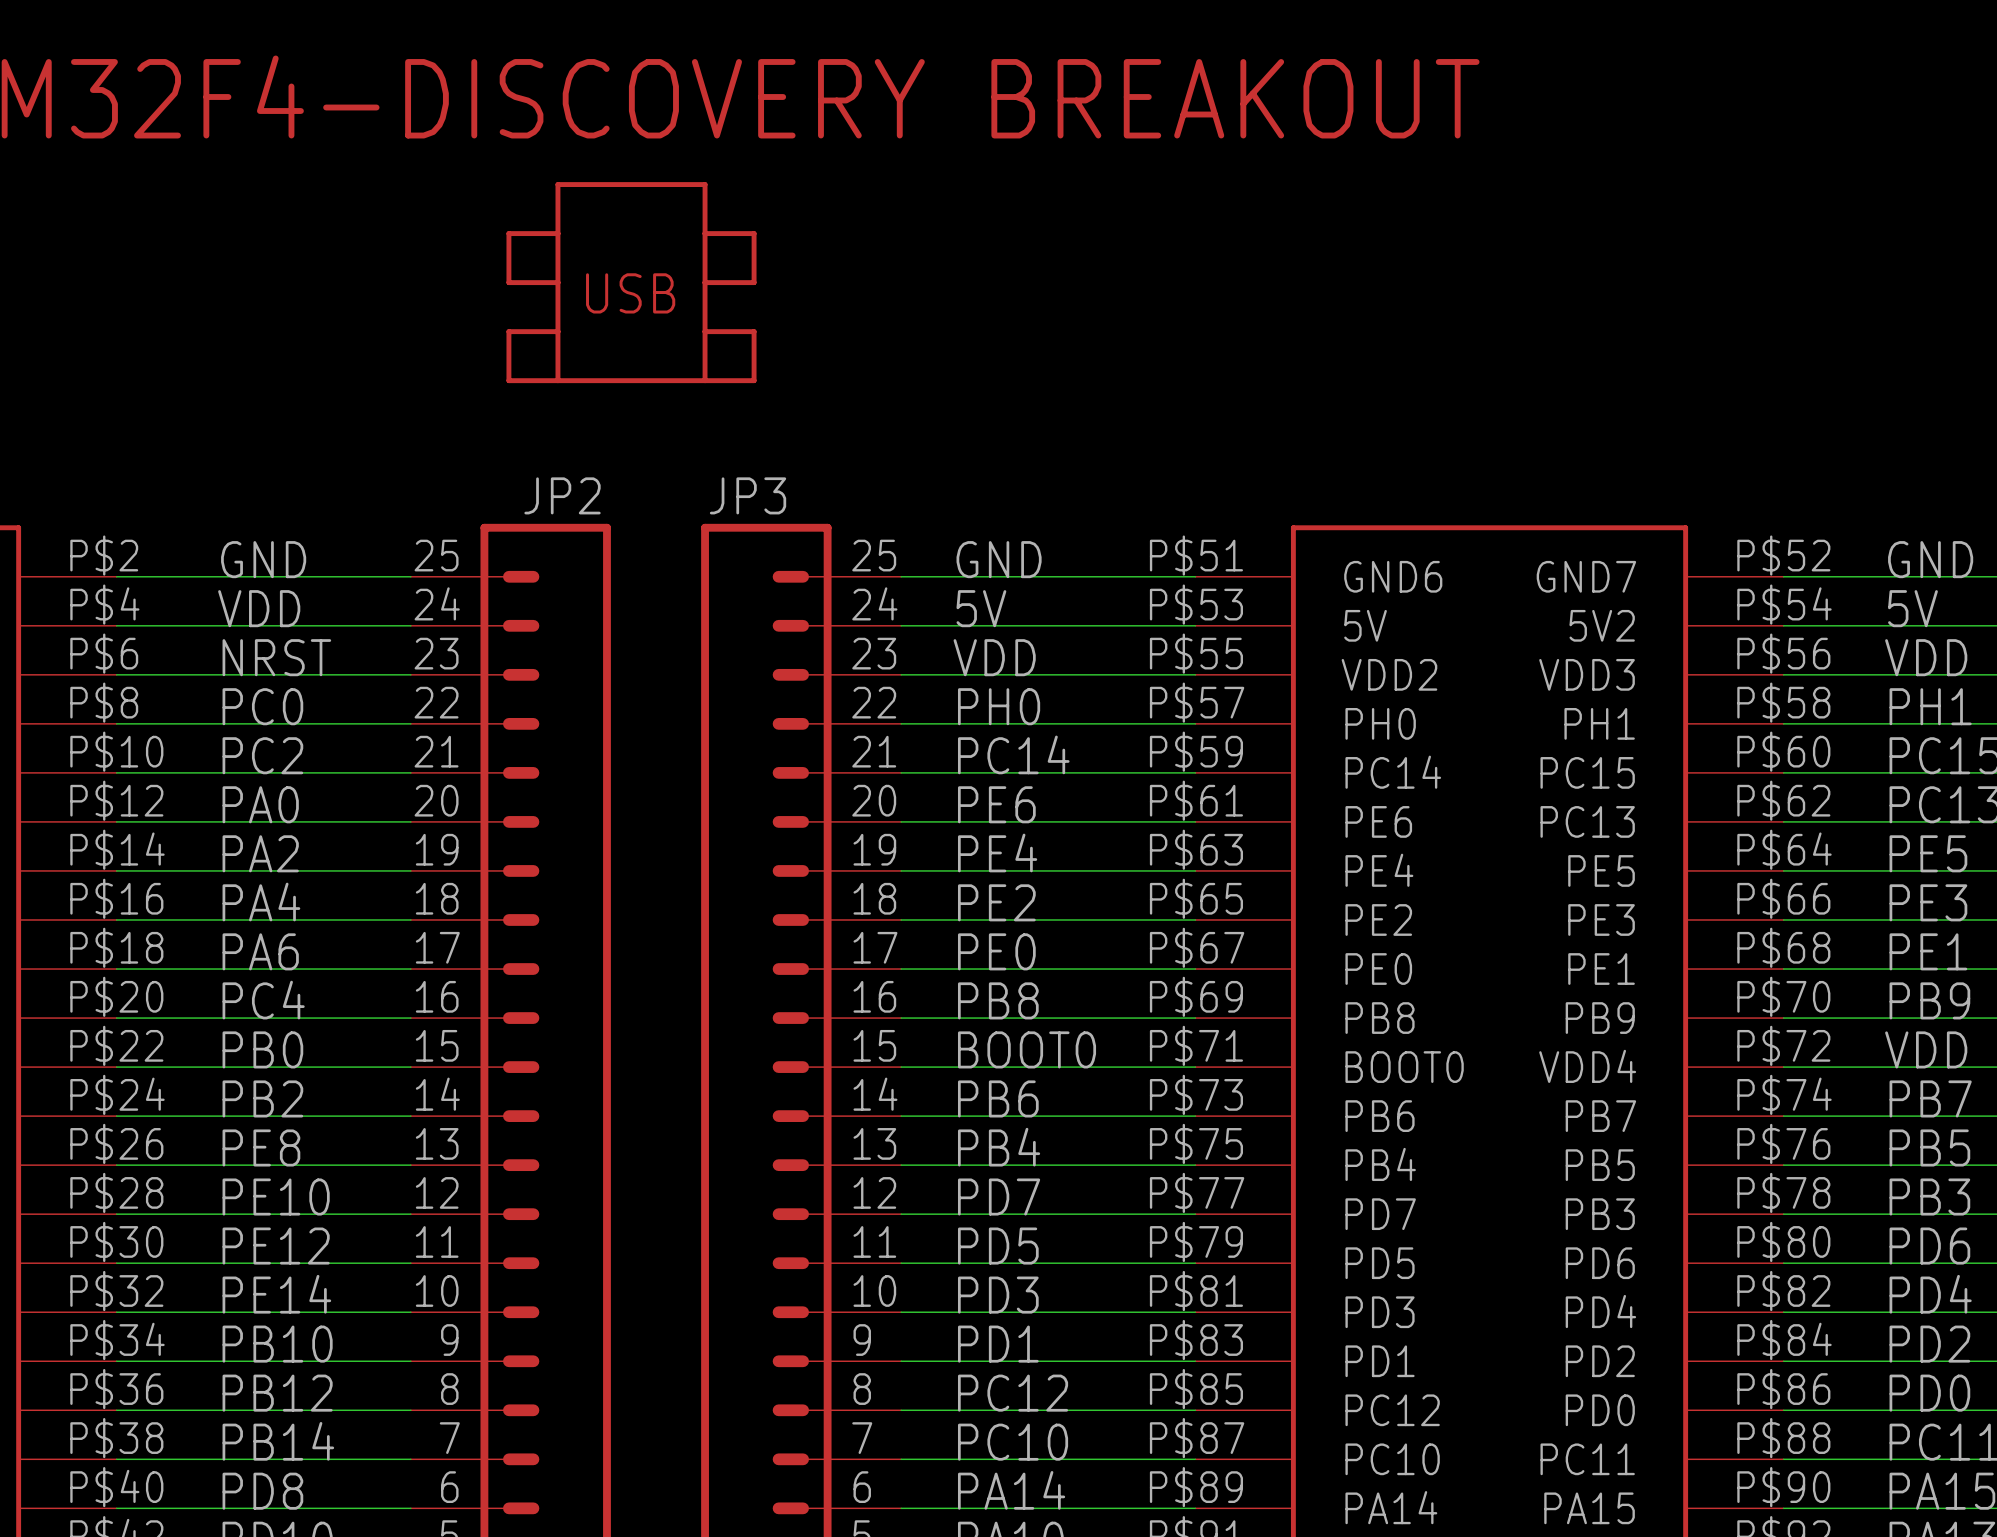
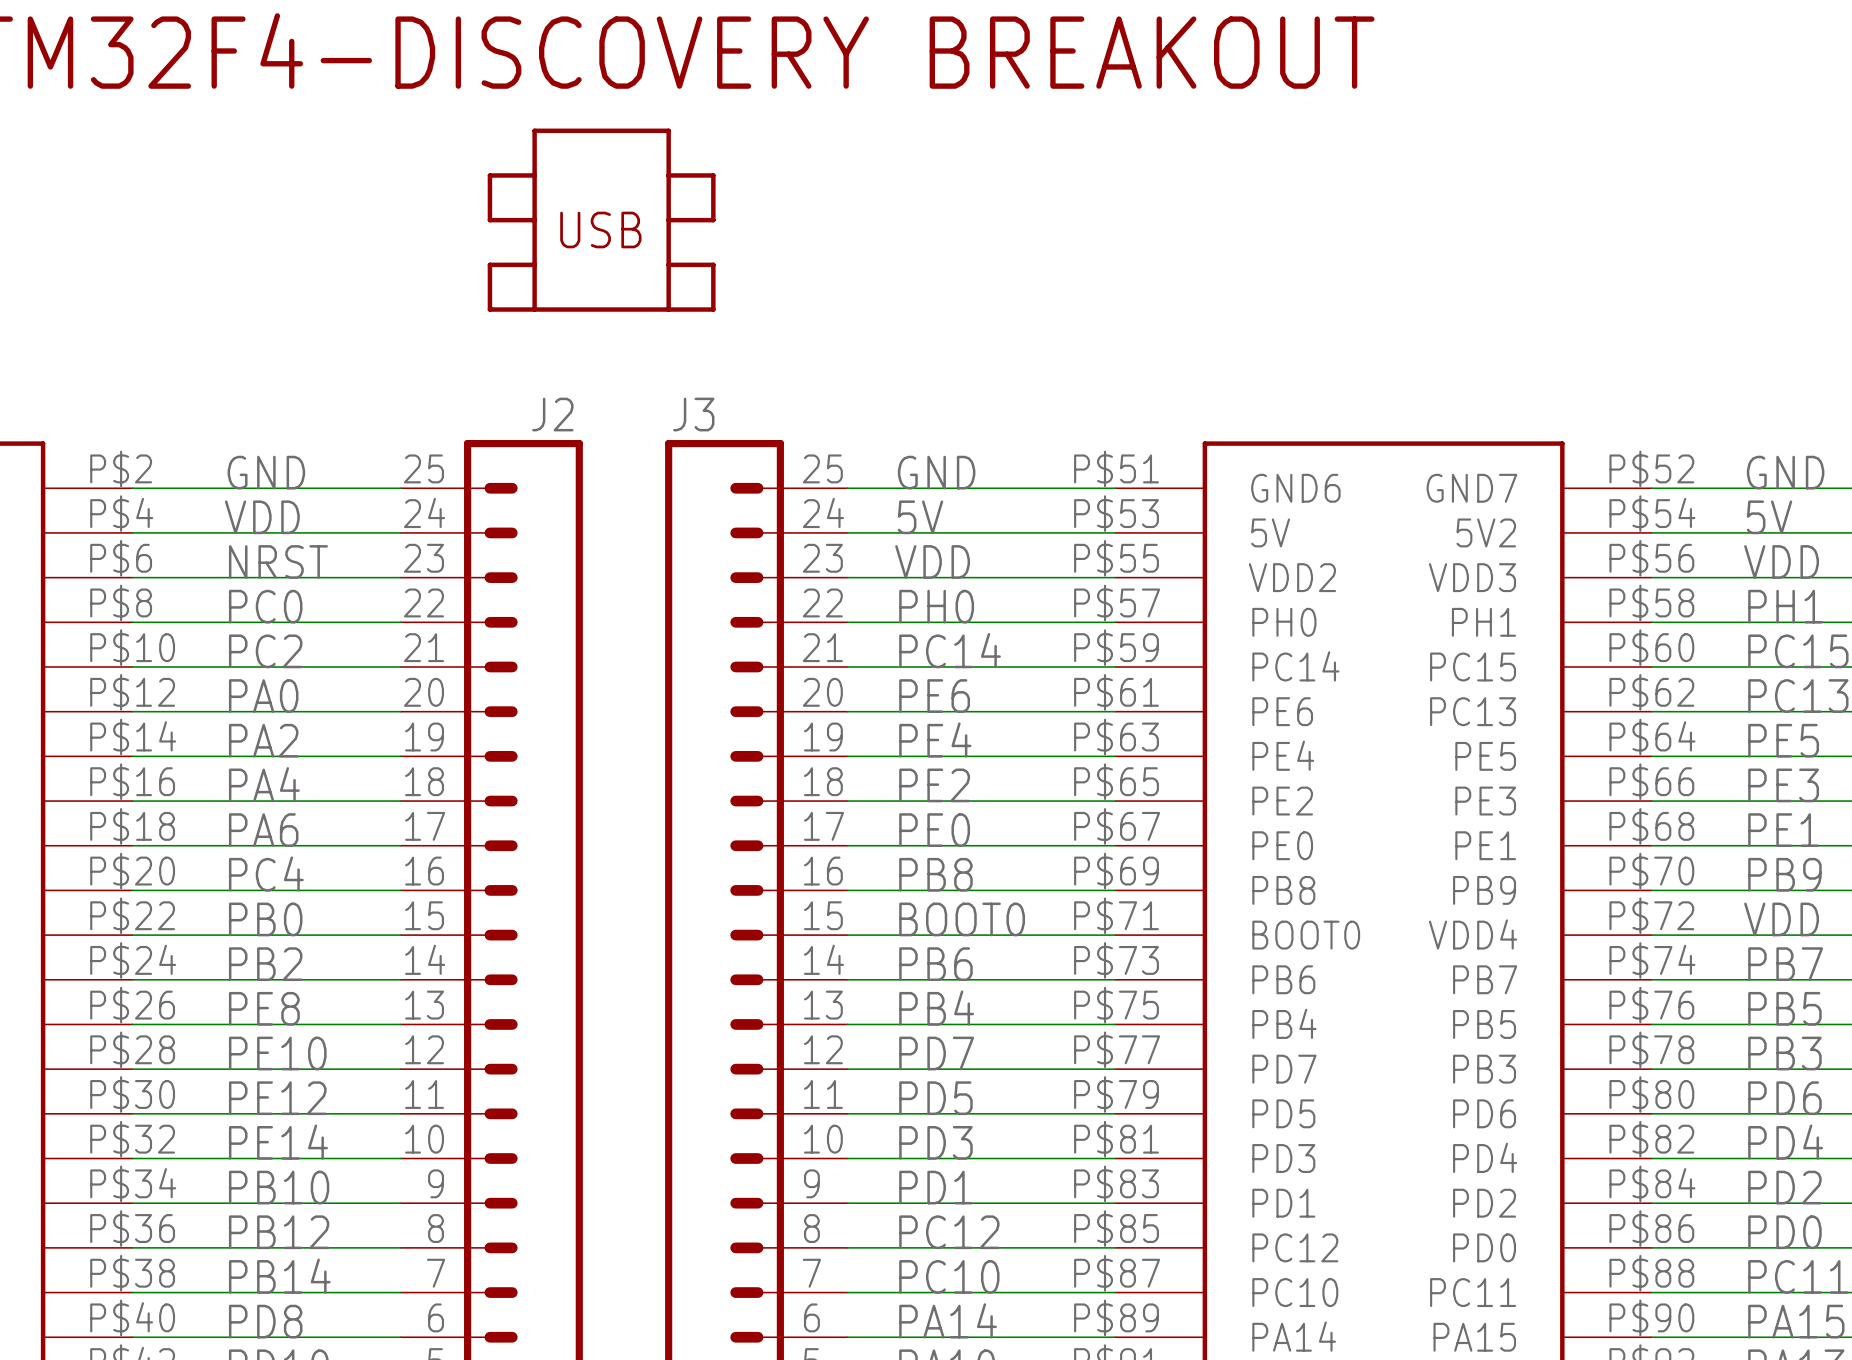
JP2 name: JP2 (562, 495) -> J2 (552, 414)
JP3 name: JP3 (748, 495) -> J3 (693, 414)

